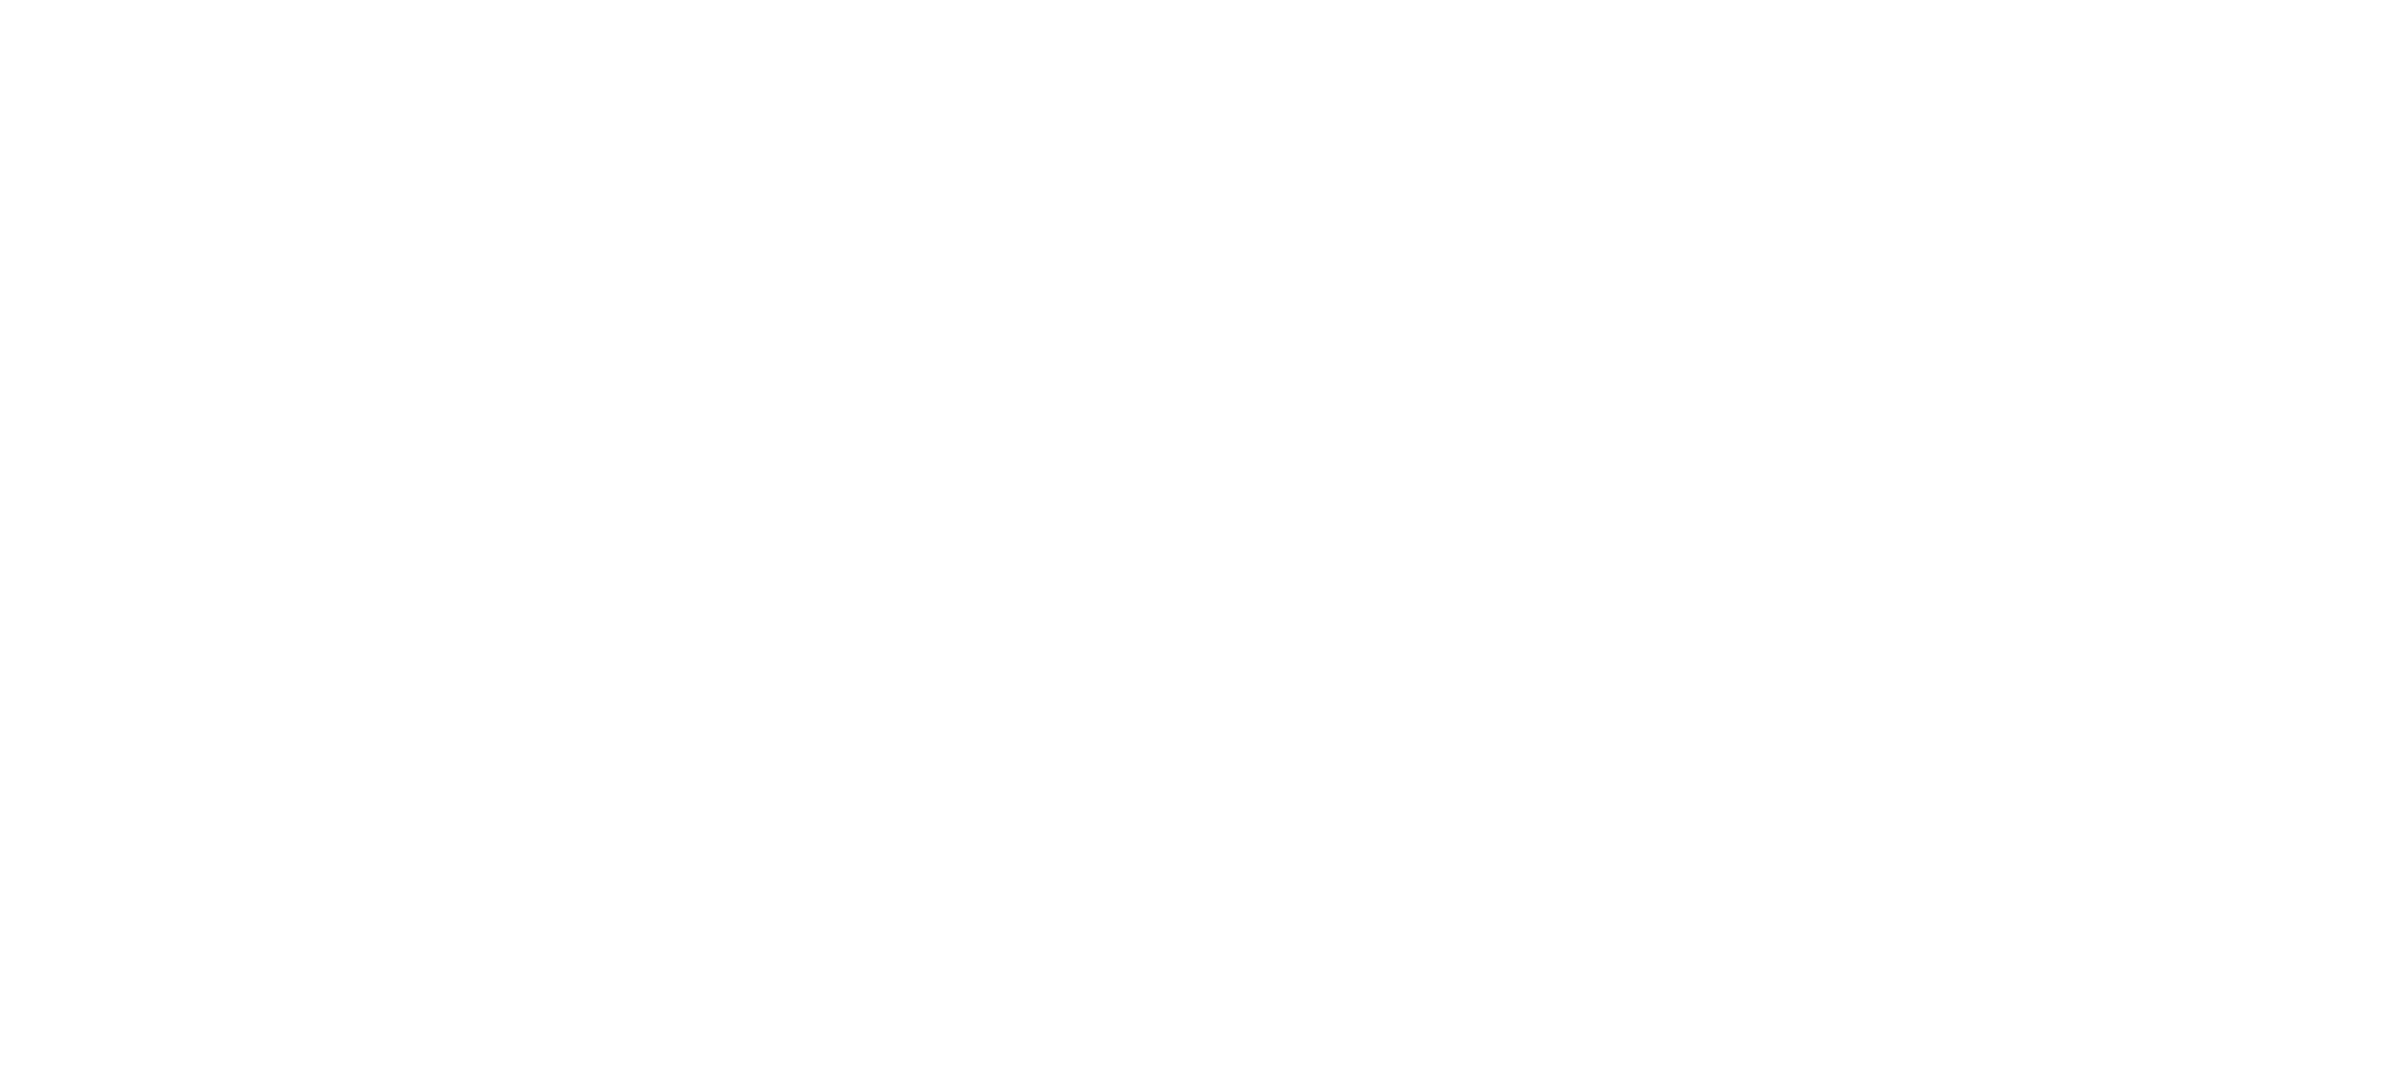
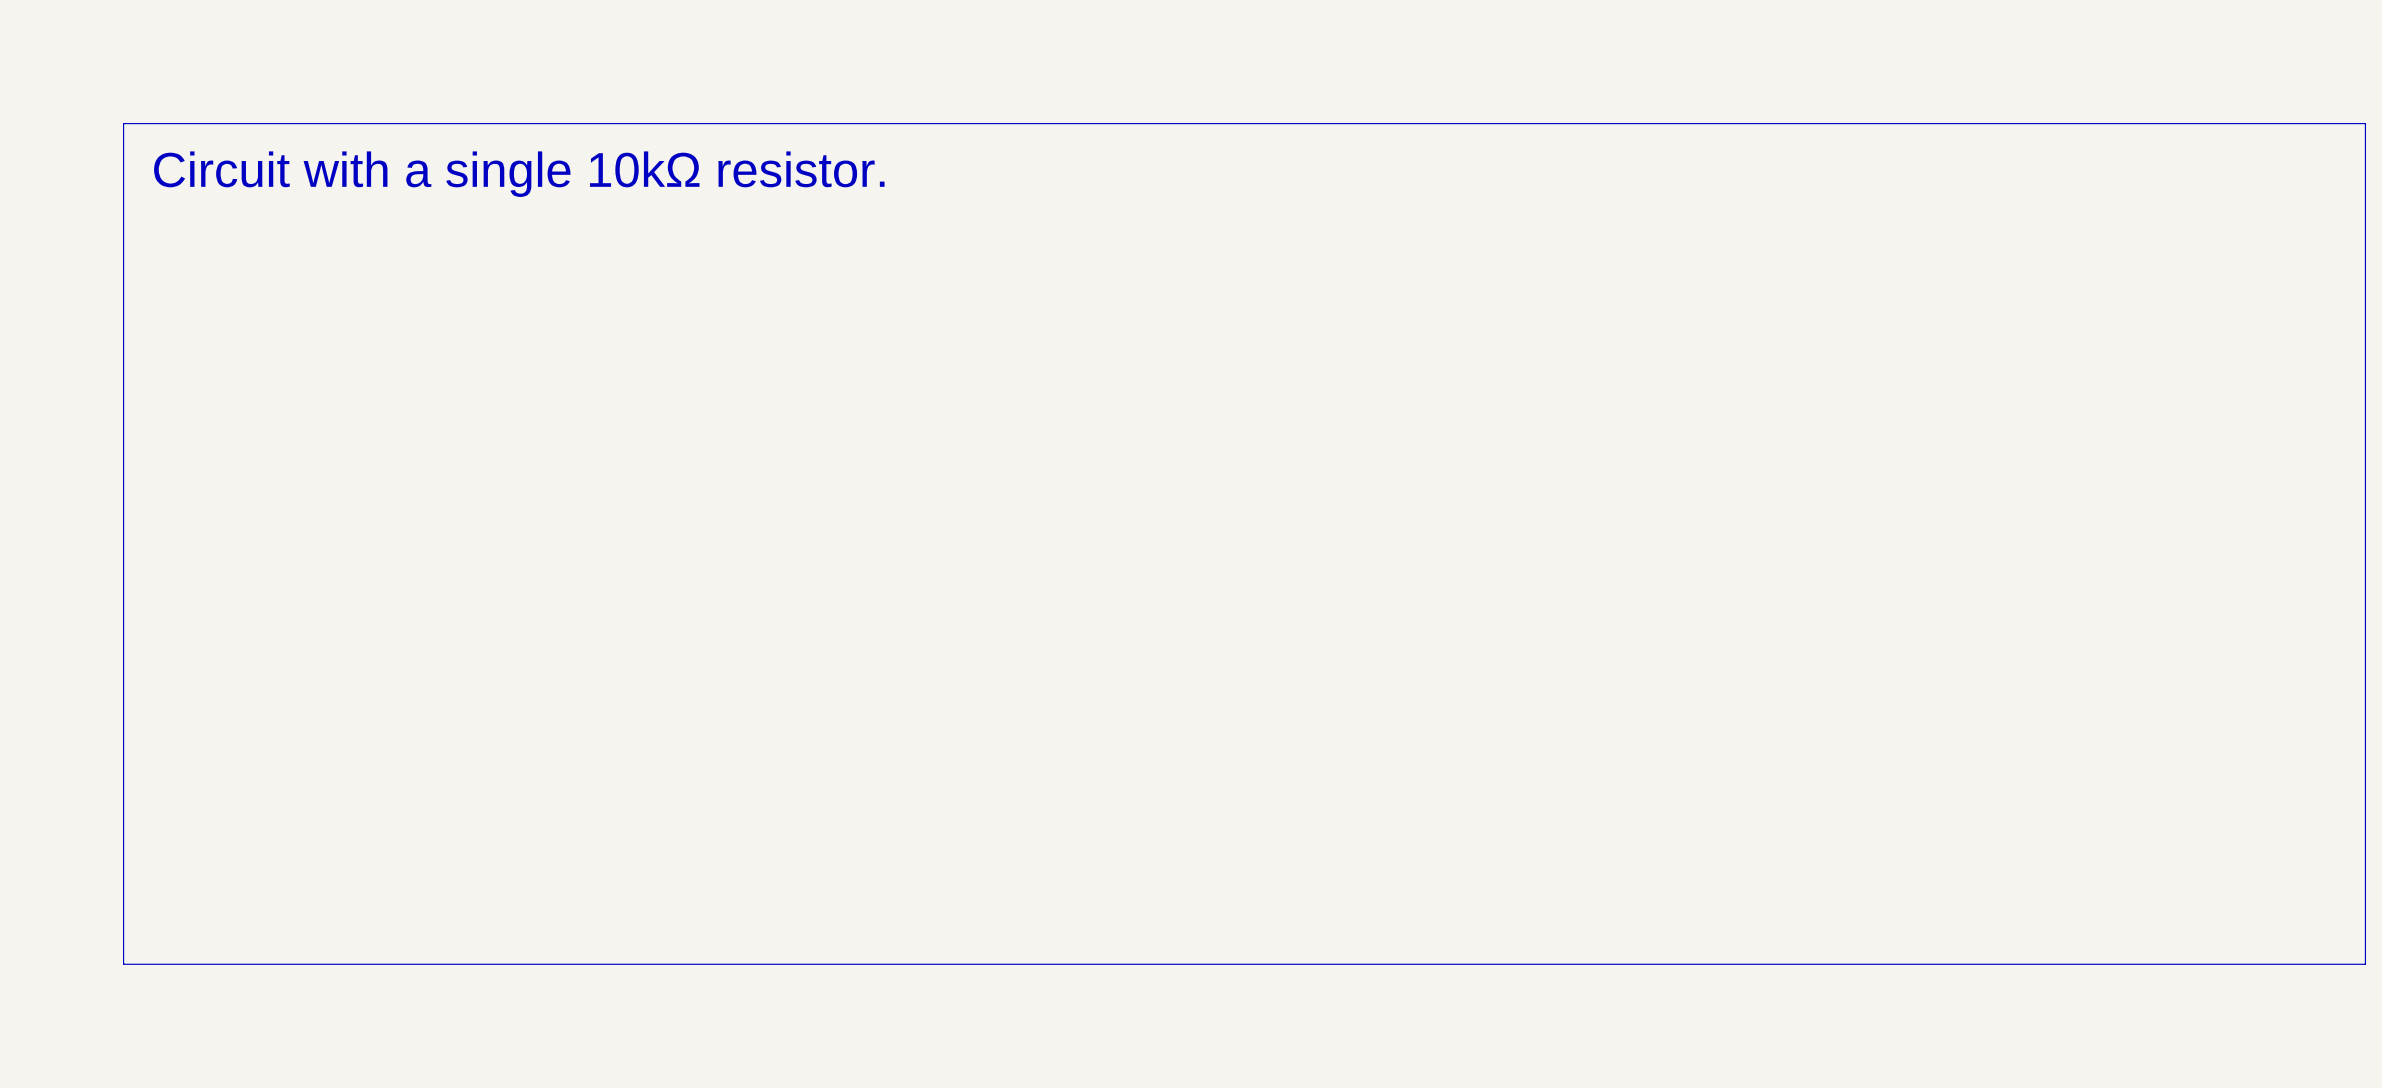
line: none -> (123, 123) (2365, 123) (2365, 964) (123, 964) (123, 123)
text: none -> Circuit with a single 10kΩ resistor. (519, 174)

